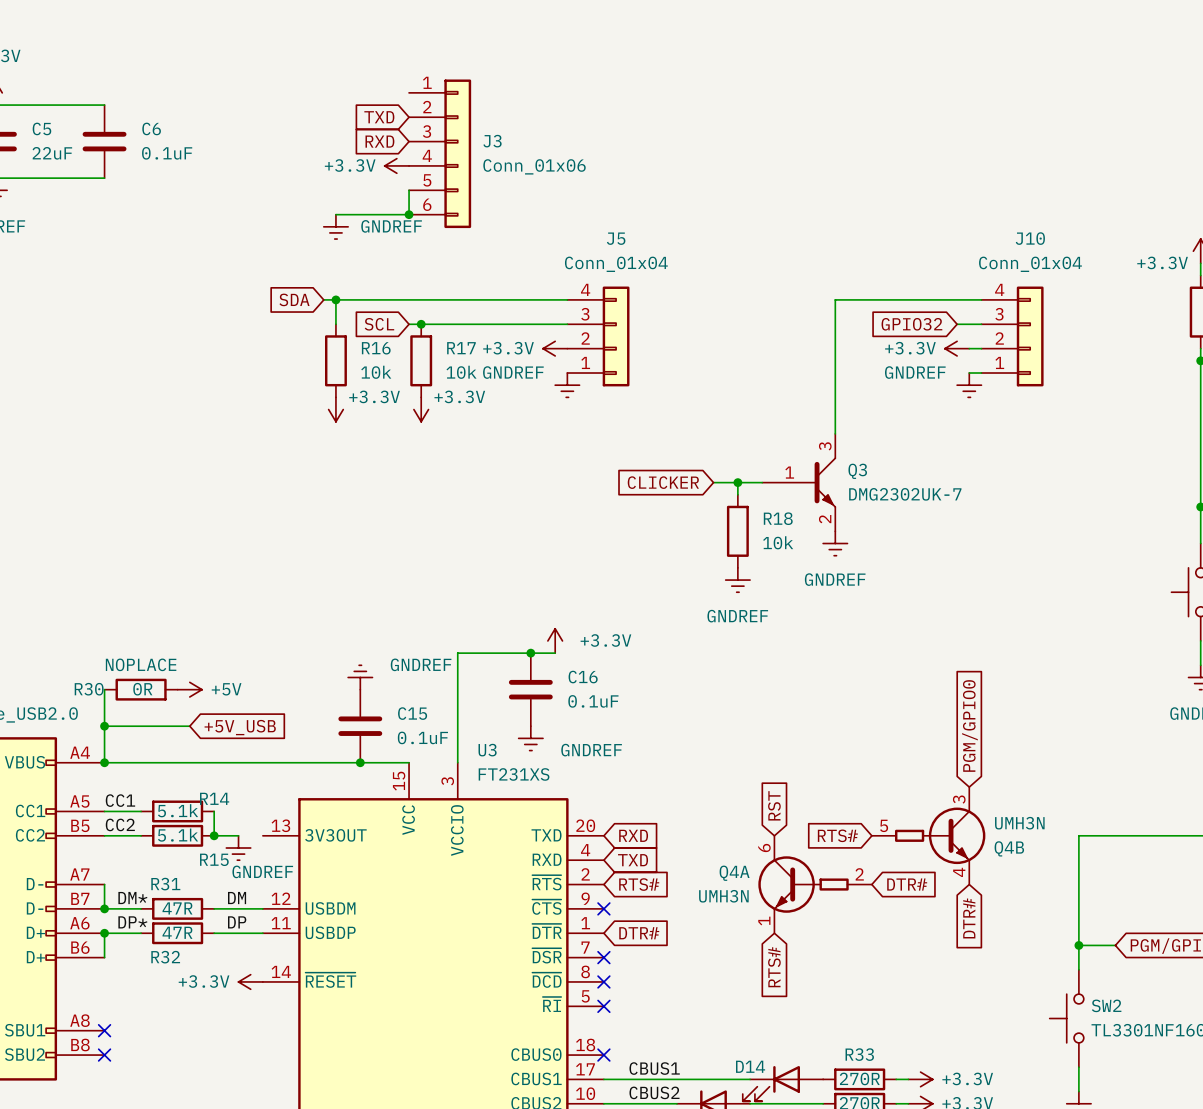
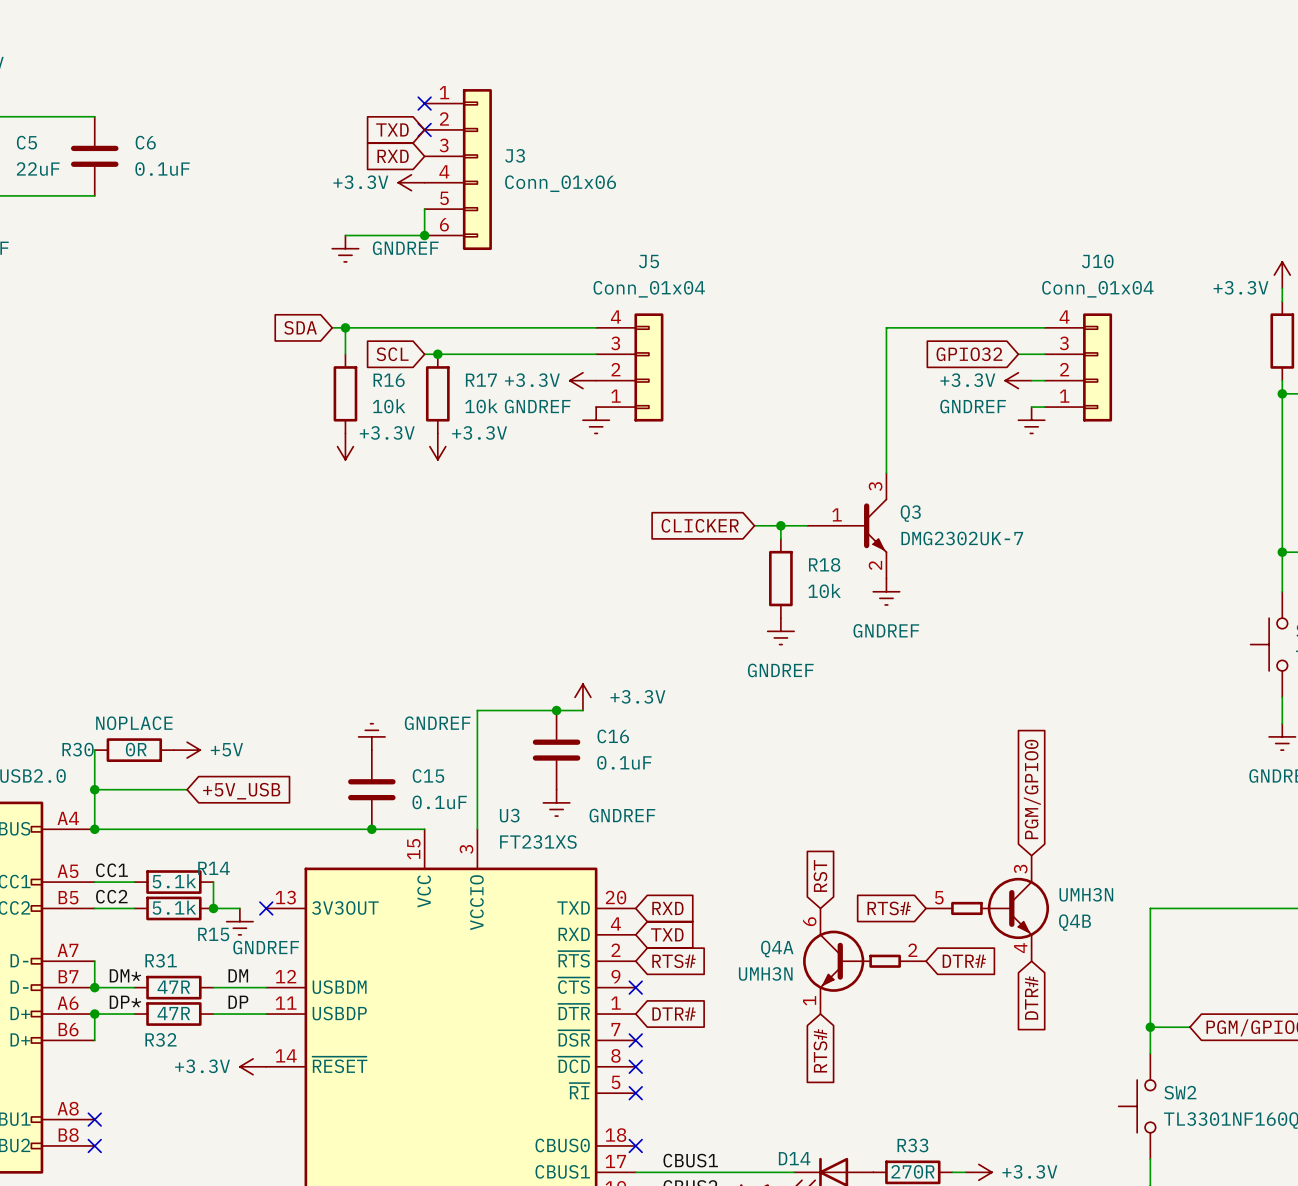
no-connect mark: none -> (424, 103)
no-connect mark: none -> (424, 129)
no-connect mark: none -> (266, 908)

